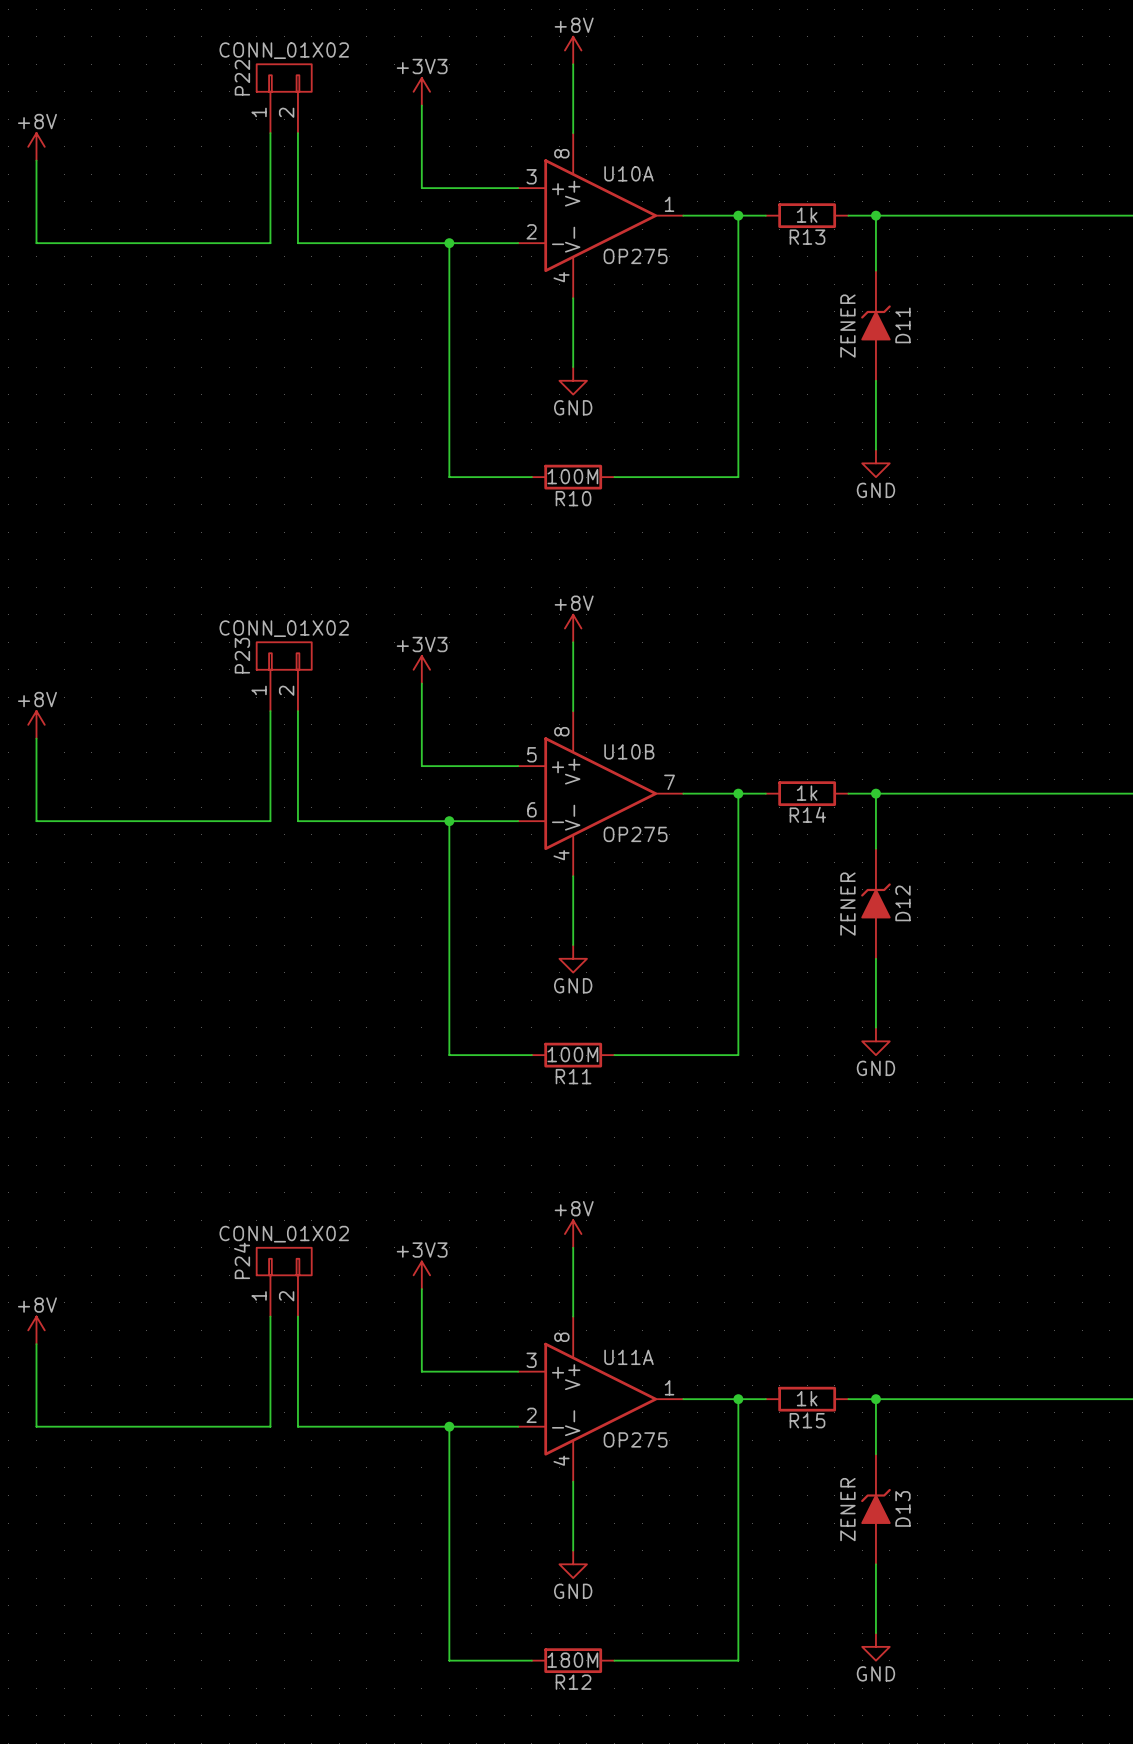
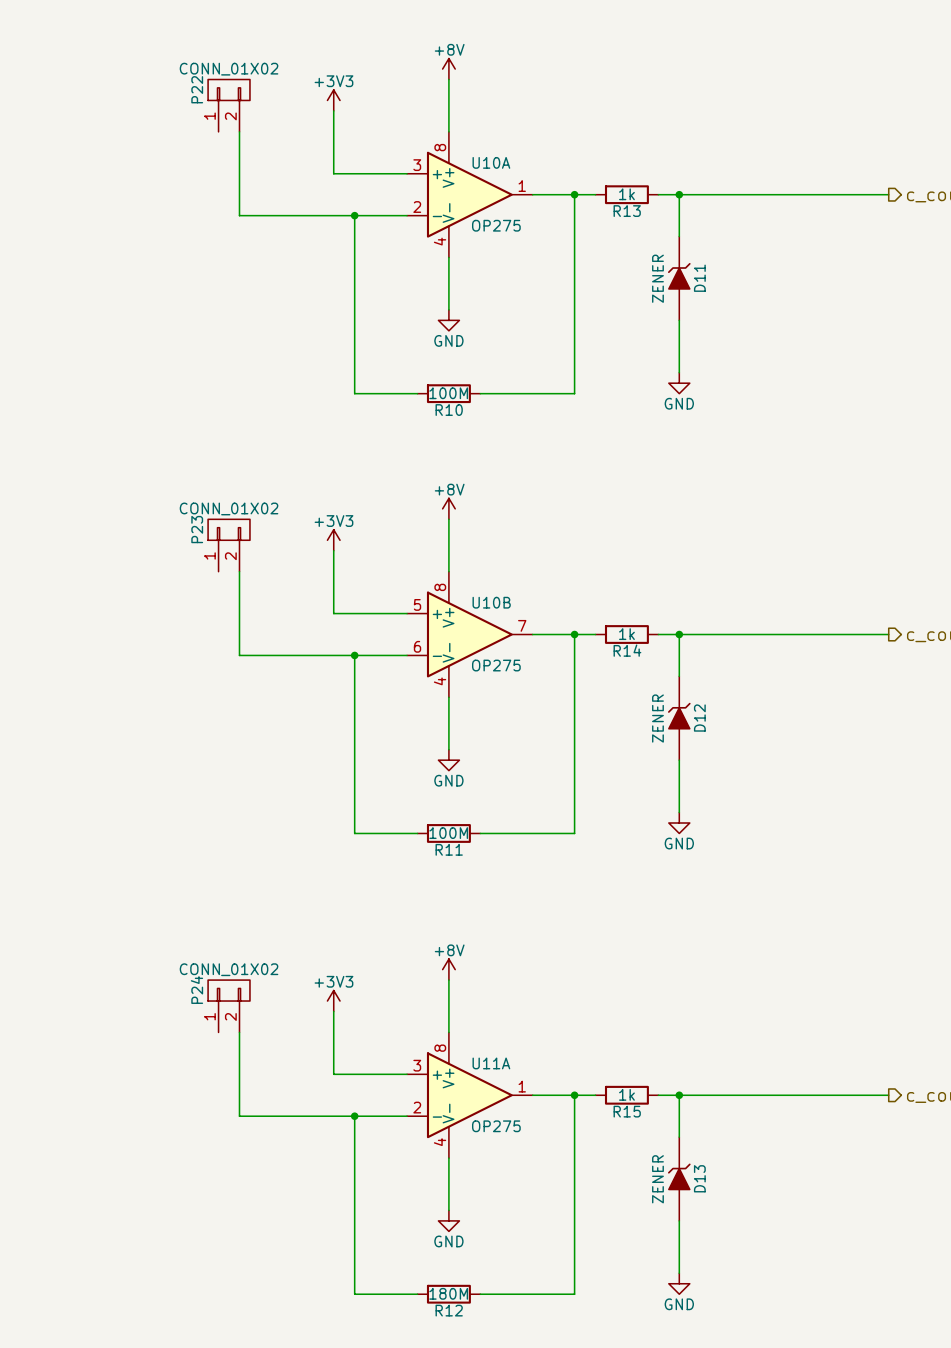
wire: (270, 133) (270, 243) (36, 243) (36, 160) -> none
power symbol: +8V (36, 146) -> none
wire: (270, 711) (270, 821) (36, 821) (36, 738) -> none
power symbol: +8V (36, 724) -> none
wire: (270, 1316) (270, 1426) (36, 1426) (36, 1344) -> none
power symbol: +8V (36, 1330) -> none

